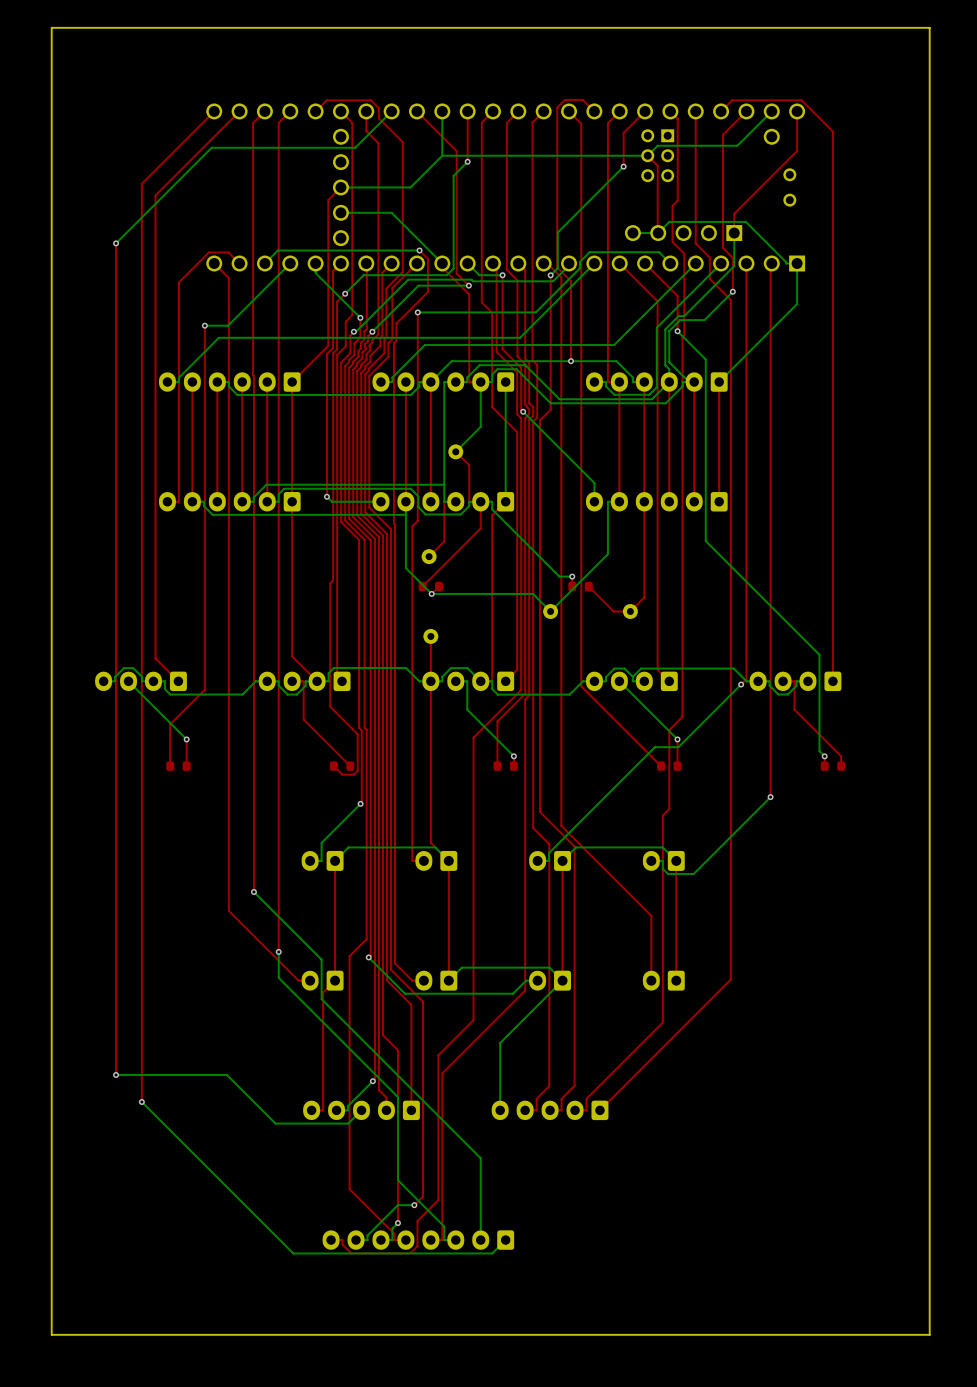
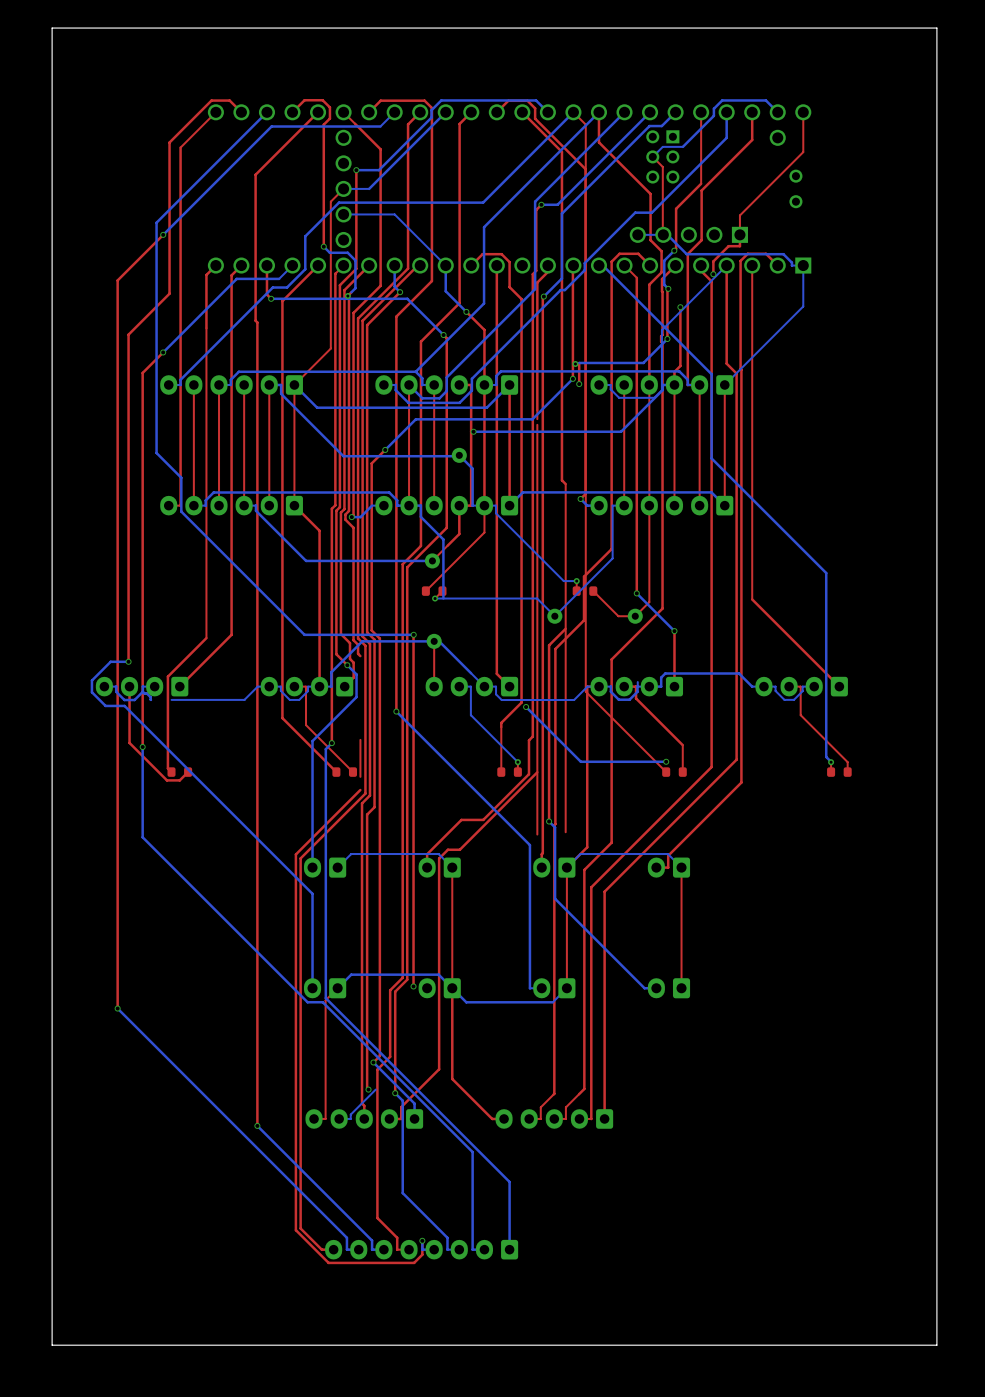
top track: (239, 111) (155, 195) (155, 658) (178, 681) -> (241, 112) (229, 100) (211, 100) (169, 142) (169, 293) (128, 334) (128, 661)
top track: (264, 111) (253, 123) (253, 892) -> none
bottom track: none -> (266, 112) (156, 222) (156, 453) (181, 477) (181, 511) (304, 634) (413, 634)
top track: (290, 111) (278, 122) (278, 951) -> (292, 112) (304, 100) (322, 100) (329, 107) (329, 118) (323, 124) (323, 246)
top track: (315, 111) (326, 100) (371, 100) (378, 108) (378, 118) (402, 142) (402, 271) (386, 288) (386, 338) (384, 340) (384, 353) (365, 374) (365, 512) (386, 533) (386, 980) (411, 1004) (411, 1110) -> (318, 112) (255, 174) (255, 320) (257, 322) (257, 1125)
top track: (366, 111) (366, 131) (378, 143) (378, 334) (369, 345) (370, 350) (366, 354) (366, 359) (357, 371) (357, 515) (378, 537) (378, 1090) (386, 1097) (386, 1110) -> (369, 112) (380, 100) (424, 100) (431, 107) (431, 281) (396, 316) (396, 711)
top track: (416, 111) (456, 151) (456, 273) (468, 285) -> none
bottom track: (442, 111) (442, 155) -> none
top track: (467, 111) (467, 161) -> none
top track: (493, 111) (481, 122) (481, 302) (492, 312) (492, 407) (517, 432) (517, 669) (505, 681) -> (496, 265) (496, 673) (509, 686)
top track: none -> (496, 112) (508, 100) (527, 100) (535, 108) (535, 118) (585, 169) (585, 494) (580, 498)
top track: (518, 111) (506, 122) (506, 269) (517, 280) (517, 356) (525, 364) (525, 404) (529, 409) (529, 414) (525, 418) (525, 693) (497, 721) -> (471, 265) (482, 254) (501, 254) (509, 262) (509, 287) (521, 299) (521, 702) (501, 722) (501, 727)
top track: (543, 111) (532, 122) (532, 360) (537, 364) (537, 417) (533, 421) -> none
bottom track: none -> (547, 112) (536, 100) (441, 100) (431, 110) (431, 117) (378, 170) (356, 170)
top track: (594, 111) (582, 99) (564, 99) (557, 107) (557, 267) (571, 281) (571, 361) -> (598, 112) (598, 142) (650, 194) (650, 240) (661, 251) (661, 272) (649, 284) (649, 384)
bottom track: none -> (598, 112) (484, 227) (484, 303) (415, 371)
top track: (619, 111) (607, 123) (607, 382) (619, 382) -> none
bottom track: none -> (624, 112) (535, 201) (535, 289) (446, 377) (446, 391) (439, 398) (422, 398) (409, 384)
top track: (645, 111) (623, 132) (623, 166) -> none
bottom track: none -> (650, 112) (557, 204) (541, 204)
top track: (670, 111) (677, 118) (677, 200) (672, 205) (672, 242) (684, 253) (682, 716) (669, 730) (669, 809) (662, 815) (662, 1022) (586, 1098) (586, 1110) -> (701, 265) (701, 270) (711, 281) (711, 767) (591, 887) (591, 1118)
bottom track: none -> (675, 112) (661, 126) (649, 126) (561, 213) (561, 278) (543, 296)
top track: (721, 111) (732, 100) (801, 100) (832, 131) (832, 681) -> none
top track: (746, 111) (723, 134) (723, 248) (732, 257) (732, 291) -> (752, 112) (752, 139) (701, 190) (701, 240) (687, 254) (687, 384) (699, 384)
bottom track: (771, 111) (737, 145) (677, 145) -> (777, 112) (765, 100) (722, 100) (713, 108) (713, 115) (682, 146)
top track: (352, 122) (352, 315) (345, 321) (345, 346) (337, 355) (337, 676) (342, 681) -> (369, 265) (344, 290) (344, 509) (340, 512) (340, 634) (349, 643) (349, 658) (353, 662) (353, 677) (344, 686)
top track: none -> (355, 123) (380, 149) (380, 285) (353, 312) (353, 515) (351, 517)
bottom track: (377, 125) (355, 147) (211, 147) (116, 243) -> (380, 126) (271, 126) (163, 234)
top track: (179, 146) (141, 183) (141, 1102) -> none
bottom track: (442, 155) (410, 187) (366, 187) -> (445, 112) (369, 188)
bottom track: (647, 155) (442, 155) -> none
bottom track: (467, 161) (453, 175) (453, 268) (446, 275) (363, 275) (345, 293) -> none
via: (467, 161) -> none
bottom track: (623, 166) (557, 232) (557, 268) (550, 275) -> none
via: (623, 166) -> none
top track: none -> (356, 170) (356, 268) (339, 285) (339, 507) (336, 510) (336, 654) (347, 665)
via: none -> (356, 170)
top track: (695, 182) (695, 243) (709, 257) (709, 279) (730, 300) (730, 979) (599, 1110) -> (726, 265) (726, 363) (736, 373) (736, 759) (604, 891) (604, 1118)
top track: none -> (701, 183) (676, 208) (676, 248) (674, 250)
via: none -> (541, 204)
top track: none -> (163, 234) (117, 280) (117, 1008)
via: none -> (163, 234)
bottom track: (658, 233) (669, 221) (745, 221) (786, 263) -> (663, 234) (667, 234) (686, 254) (783, 254) (791, 262) (792, 265)
top track: none -> (739, 234) (739, 246) (728, 246) (713, 261) (713, 274)
bottom track: (734, 233) (734, 266) (684, 316) (678, 316) (665, 329) (665, 365) (669, 369) (669, 382) (652, 399) (559, 399) (525, 365) (479, 365) (467, 377) (467, 382) (444, 382) (444, 501) (455, 501) -> none
top track: (116, 243) (116, 1074) -> none
via: (116, 243) -> none
bottom track: none -> (323, 246) (329, 252) (347, 252) (355, 260) (355, 288) (351, 292)
via: none -> (323, 246)
bottom track: none -> (674, 250) (664, 260) (664, 284) (668, 288)
via: none -> (674, 250)
top track: (419, 250) (427, 258) (427, 292) (396, 323) (396, 340) (393, 343) (394, 963) (412, 980) (423, 980) -> none
bottom track: (419, 250) (277, 250) (264, 263) -> none
via: (419, 250) -> none
top track: (214, 263) (228, 278) (228, 910) (298, 980) (310, 980) -> (215, 265) (206, 274) (206, 328)
top track: (239, 263) (228, 252) (209, 252) (178, 282) (178, 501) -> (180, 147) (180, 505)
top track: none -> (241, 265) (231, 275) (231, 634) (179, 686)
top track: none -> (266, 265) (266, 294) (271, 298)
bottom track: (315, 263) (315, 273) (360, 317) -> none
top track: (366, 263) (366, 328) (364, 331) (364, 339) (360, 342) (358, 356) (349, 367) (349, 518) (370, 540) (370, 955) (368, 957) -> none
top track: (391, 263) (382, 272) (382, 335) (380, 337) (380, 345) (370, 355) (370, 361) (361, 372) (361, 513) (382, 535) (382, 1035) (397, 1050) (397, 1223) -> none
bottom track: none -> (394, 265) (394, 286) (400, 292)
top track: (416, 263) (392, 288) (392, 339) (388, 343) (388, 356) (369, 376) (369, 507) (390, 529) (390, 969) (423, 1001) (423, 1196) (414, 1205) -> (420, 265) (417, 265) (362, 320) (362, 636) (369, 643) (369, 795) (362, 803) (362, 1103) (364, 1105) (364, 1118)
top track: (442, 263) (442, 267) (469, 294) (469, 382) (480, 382) -> none
bottom track: none -> (445, 265) (445, 291) (466, 311)
bottom track: (467, 263) (479, 275) (502, 275) -> none
top track: (493, 263) (496, 267) (496, 351) (517, 372) (517, 414) (521, 418) (521, 690) (473, 737) (473, 1020) (438, 1055) (438, 1200) (417, 1221) (417, 1246) (410, 1253) (351, 1253) (342, 1244) (342, 1240) (331, 1240) -> (420, 112) (408, 124) (408, 268) (358, 318) (358, 638) (365, 645) (365, 793) (300, 858) (300, 1228) (321, 1249) (333, 1249)
top track: (543, 263) (547, 263) (561, 277) (561, 480) -> (522, 112) (561, 151) (561, 480) (565, 484)
top track: none -> (573, 265) (572, 378)
bottom track: (569, 263) (553, 281) (408, 279) (353, 331) -> none
bottom track: (594, 263) (520, 337) (218, 337) (178, 377) (178, 382) -> (573, 112) (483, 202) (339, 202) (305, 236) (305, 269) (287, 287) (272, 287) (180, 379) (180, 384)
top track: (645, 263) (677, 296) (677, 331) -> none
bottom track: (670, 263) (659, 252) (589, 252) (580, 261) (580, 268) (535, 312) (417, 312) -> none
bottom track: (695, 263) (614, 345) (424, 345) (392, 377) (392, 382) -> (726, 112) (726, 137) (651, 212) (635, 212) (584, 263) (584, 270) (564, 290) (560, 290) (471, 378) (471, 390) (459, 402) (408, 402) (395, 390) (395, 384)
top track: (771, 263) (770, 797) -> (777, 265) (765, 253) (747, 253) (740, 260) (741, 782) (668, 855) (668, 867) (656, 867)
top track: (522, 267) (525, 270) (525, 358) (529, 362) (529, 403) (533, 407) -> (547, 265) (547, 271) (537, 282) (537, 410)
top track: (333, 271) (333, 347) (326, 353) (326, 496) -> (335, 273) (335, 505) (331, 508) (331, 743)
via: none -> (713, 274)
top track: (502, 275) (502, 349) (521, 367) (521, 409) (523, 411) -> none
via: (502, 275) -> none
top track: (550, 275) (550, 409) (539, 420) (539, 811) (574, 846) (574, 1085) -> (675, 265) (662, 279) (662, 608) (611, 659) (611, 842) (584, 869) (584, 1088) (579, 1094)
via: (550, 275) -> none
top track: (631, 275) (657, 301) (657, 669) (669, 681) -> (636, 277) (636, 593)
bottom track: (277, 276) (228, 325) (204, 325) -> (279, 278) (236, 278) (163, 352)
bottom track: (468, 285) (418, 285) (372, 331) -> none
via: (468, 285) -> none
top track: none -> (668, 288) (667, 338)
via: none -> (668, 288)
top track: none -> (400, 292) (367, 325) (367, 632) (374, 639) (374, 807) (367, 814) (368, 1089)
via: none -> (400, 292)
top track: none -> (351, 292) (348, 294) (348, 510) (345, 514) (345, 519) (353, 527) (353, 640) (358, 644) (358, 653) (360, 656)
bottom track: (732, 291) (704, 320) (680, 320) (669, 331) (669, 362) (689, 382) -> none
via: (732, 291) -> none
top track: (345, 293) (337, 301) (337, 349) (333, 353) (333, 580) (330, 583) (330, 706) (357, 734) -> none
top track: none -> (543, 296) (541, 867)
via: none -> (543, 296)
bottom track: none -> (271, 298) (407, 298) (443, 335)
via: none -> (271, 298)
top track: none -> (680, 307) (680, 365) (674, 371) (674, 384)
via: none -> (680, 307)
via: none -> (466, 311)
top track: (417, 312) (417, 520) (412, 526) (412, 860) (423, 860) -> (541, 204) (536, 209) (536, 270) (532, 274) (532, 736) (528, 740) (528, 774) (483, 819) (461, 819) (427, 854) (427, 867)
via: (417, 312) -> none
top track: (360, 317) (360, 337) (354, 343) (354, 354) (345, 366) (345, 520) (364, 539) (364, 727) (366, 729) (366, 939) (349, 956) (349, 1189) (394, 1233) (394, 1240) -> (471, 112) (459, 123) (459, 303) (420, 341) (420, 545) (402, 564) (402, 977) (390, 990) (390, 1056) (377, 1069) (377, 1218) (397, 1237) (397, 1249)
via: (360, 317) -> none
via: (204, 325) -> none
top track: (353, 331) (350, 335) (350, 353) (341, 362) (341, 522) (359, 539) (359, 727) (361, 730) (360, 803) -> none
via: (353, 331) -> none
top track: (372, 331) (364, 344) (365, 349) (362, 352) (362, 358) (353, 369) (353, 517) (374, 538) (374, 1079) (372, 1081) -> none
via: (372, 331) -> none
bottom track: (677, 331) (705, 359) (705, 541) (819, 654) (819, 751) (824, 756) -> (598, 265) (602, 265) (711, 374) (711, 458) (826, 573) (826, 756) (831, 761)
via: (677, 331) -> none
top track: none -> (443, 335) (446, 338) (446, 527) (407, 567) (407, 979) (395, 991) (395, 1093)
via: none -> (443, 335)
bottom track: none -> (667, 338) (643, 362) (579, 362)
via: none -> (667, 338)
top track: none -> (163, 352) (142, 372) (142, 746)
via: none -> (163, 352)
top track: none -> (579, 362) (579, 384)
bottom track: none -> (415, 371) (422, 378) (422, 384)
bottom track: none -> (572, 378) (532, 419) (415, 419) (385, 449)
via: none -> (572, 378)
via: none -> (579, 384)
bottom track: (419, 382) (419, 386) (410, 394) (237, 394) (228, 386) (228, 382) -> (415, 371) (238, 371) (230, 379) (230, 384)
bottom track: (480, 382) (480, 426) (455, 451) -> none
bottom track: (505, 382) (505, 501) -> (509, 384) (486, 407) (317, 407) (294, 384)
bottom track: (644, 382) (632, 382) (632, 377) (616, 361) (451, 361) (430, 382) -> none
bottom track: none -> (674, 384) (662, 384) (662, 390) (621, 431) (473, 431)
bottom track: (682, 382) (682, 386) (665, 403) (550, 403) (516, 369) (497, 369) (492, 374) (492, 382) -> (688, 384) (687, 379) (679, 371) (500, 371) (496, 376) (496, 384)
bottom track: (523, 411) (594, 483) (594, 501) -> (580, 498) (587, 505) (599, 505)
via: (523, 411) -> none
top track: (533, 415) (529, 419) (529, 695) (525, 699) (525, 990) (442, 1073) (442, 1240) (430, 1240) -> none
via: none -> (473, 431)
top track: none -> (385, 449) (371, 463) (371, 630) (379, 638) (379, 1056) (373, 1062)
via: none -> (385, 449)
top track: (455, 451) (469, 465) (469, 501) (480, 501) -> (466, 311) (484, 329) (484, 505)
bottom track: (444, 484) (266, 484) (253, 497) (253, 501) -> (432, 560) (306, 560) (255, 510) (255, 505)
via: none -> (580, 498)
bottom track: (326, 496) (331, 501) (369, 501) -> (351, 517) (360, 517) (372, 505)
via: (326, 496) -> none
bottom track: (203, 501) (203, 506) (212, 514) (405, 514) -> (205, 505) (205, 500) (213, 492) (389, 492) (397, 500) (397, 505) (420, 505) (420, 516) (443, 539) (443, 598)
top track: (292, 501) (292, 656) (317, 681) -> (294, 505) (319, 530) (319, 686)
bottom track: (405, 501) (405, 568) (431, 593) -> none
top track: (455, 501) (444, 501) (444, 541) -> (459, 384) (471, 384) (471, 505) (459, 505) (459, 534) (447, 545)
bottom track: (469, 501) (469, 506) (460, 514) (425, 514) (418, 507) (418, 496) (410, 488) (284, 488) (278, 494) (278, 501) (267, 501) -> (472, 505) (472, 468) (459, 455) (343, 456) (281, 393) (281, 384) (269, 384)
top track: (505, 501) (492, 515) (492, 681) (480, 681) -> (509, 505) (509, 384)
bottom track: none -> (724, 505) (711, 492) (522, 492) (509, 505)
via: none -> (351, 517)
bottom track: none -> (636, 593) (674, 631)
via: none -> (636, 593)
top track: (746, 594) (746, 679) (741, 684) -> (752, 599) (839, 686)
top track: none -> (565, 628) (549, 645) (549, 821)
top track: none -> (674, 631) (674, 686)
via: none -> (674, 631)
top track: none -> (413, 634) (413, 986)
via: none -> (413, 634)
top track: (204, 633) (204, 689) (170, 724) (170, 766) -> (206, 638) (167, 676) (167, 768) (171, 772)
bottom track: none -> (128, 661) (110, 661) (91, 680) (91, 692) (105, 705) (124, 705) (312, 893) (312, 988)
via: none -> (128, 661)
via: none -> (347, 665)
bottom track: (467, 668) (451, 668) (442, 676) (442, 681) (419, 681) (405, 667) (334, 667) (328, 673) (328, 681) -> (471, 673) (439, 641) (362, 641) (331, 672) (331, 686)
bottom track: (128, 681) (186, 739) -> none
bottom track: (141, 681) (141, 676) (133, 668) (124, 668) (115, 677) (115, 681) -> (142, 691) (134, 700) (124, 700) (116, 691) (115, 686)
bottom track: none -> (143, 686) (142, 691)
bottom track: (153, 681) (164, 681) (164, 689) (170, 694) -> none
top track: (430, 681) (430, 842) (448, 860) -> none
top track: none -> (599, 686) (587, 686) (587, 847) (566, 867)
top track: none -> (624, 686) (636, 686) (636, 698) (682, 745)
bottom track: (619, 681) (677, 739) -> none
bottom track: none -> (637, 686) (637, 691) (629, 699) (618, 699) (610, 691) (610, 686)
bottom track: (746, 681) (733, 668) (641, 668) (632, 676) (624, 668) (614, 668) (605, 677) (605, 681) -> (752, 686) (739, 673) (665, 673) (661, 677) (661, 686) (649, 686)
bottom track: (741, 684) (678, 747) (654, 747) (549, 853) (549, 860) (537, 860) -> none
via: (741, 684) -> none
bottom track: none -> (142, 691) (147, 693) (150, 699)
bottom track: none -> (526, 707) (580, 761) (666, 761)
via: none -> (526, 707)
via: none -> (396, 711)
via: none -> (331, 743)
top track: (186, 739) (186, 766) -> (129, 686) (129, 742) (166, 780) (179, 780) (188, 772)
via: (186, 739) -> none
via: (677, 739) -> none
via: none -> (142, 746)
via: none -> (666, 761)
top track: (333, 766) (342, 774) (353, 774) (357, 770) -> (336, 772) (282, 718) (282, 301) (318, 265)
top track: none -> (537, 772) (459, 849) (447, 849) (439, 858) (439, 1069) (401, 1107) (401, 1118) (389, 1118)
top track: none -> (360, 790) (295, 854) (295, 1230) (328, 1262) (414, 1262) (422, 1254) (422, 1240)
bottom track: (770, 797) (693, 873) (667, 873) (662, 868) (662, 860) (651, 860) -> none
via: (770, 797) -> none
bottom track: (360, 803) (321, 842) (321, 860) (310, 860) -> (347, 665) (356, 674) (356, 697) (312, 741) (312, 867)
via: (360, 803) -> none
bottom track: none -> (549, 821) (555, 827) (555, 898) (644, 988) (656, 988)
via: none -> (549, 821)
top track: (561, 825) (651, 915) (651, 980) -> none
top track: (533, 828) (549, 844) (549, 1086) -> (650, 265) (638, 253) (619, 253) (611, 261) (611, 549) (584, 576) (584, 620) (555, 649) (553, 1094)
top track: (335, 860) (335, 980) -> none
bottom track: (253, 892) (321, 959) (321, 999) (480, 1158) (480, 1240) -> (142, 746) (142, 837) (307, 1002) (322, 1002) (472, 1152) (472, 1249) (484, 1249)
via: (253, 892) -> none
bottom track: (278, 951) (278, 977) (397, 1097) (397, 1180) (444, 1226) (444, 1240) -> (395, 1093) (402, 1100) (402, 1193) (447, 1237) (447, 1249)
via: (278, 951) -> none
bottom track: (368, 957) (405, 993) (513, 993) (526, 980) -> (396, 711) (529, 845) (530, 988)
via: (368, 957) -> none
via: none -> (413, 986)
top track: none -> (452, 988) (452, 1079) (492, 1118) (504, 1118)
bottom track: (562, 980) (549, 967) (461, 967) (448, 980) -> none
bottom track: (548, 994) (500, 1043) (500, 1110) -> (552, 1002) (466, 1002) (438, 974) (351, 974) (337, 988)
via: none -> (117, 1008)
bottom track: none -> (373, 1062) (414, 1103) (414, 1118)
via: none -> (373, 1062)
bottom track: (116, 1074) (226, 1074) (275, 1123) (348, 1123) (361, 1110) -> none
via: (116, 1074) -> none
via: none -> (368, 1089)
via: (372, 1081) -> none
via: none -> (395, 1093)
bottom track: (141, 1102) (293, 1253) (492, 1253) (505, 1240) -> (331, 743) (325, 749) (325, 998) (509, 1181) (509, 1249)
via: (141, 1102) -> none
via: none -> (257, 1125)
bottom track: (414, 1205) (397, 1205) (367, 1235) (367, 1240) (356, 1240) -> (117, 1008) (346, 1237) (346, 1249) (358, 1249)
via: (414, 1205) -> none
bottom track: (397, 1223) (392, 1228) (392, 1240) (380, 1240) -> (257, 1125) (372, 1240) (372, 1249) (383, 1249)
via: (397, 1223) -> none
bottom track: none -> (422, 1240) (422, 1249) (434, 1249)
via: none -> (422, 1240)

